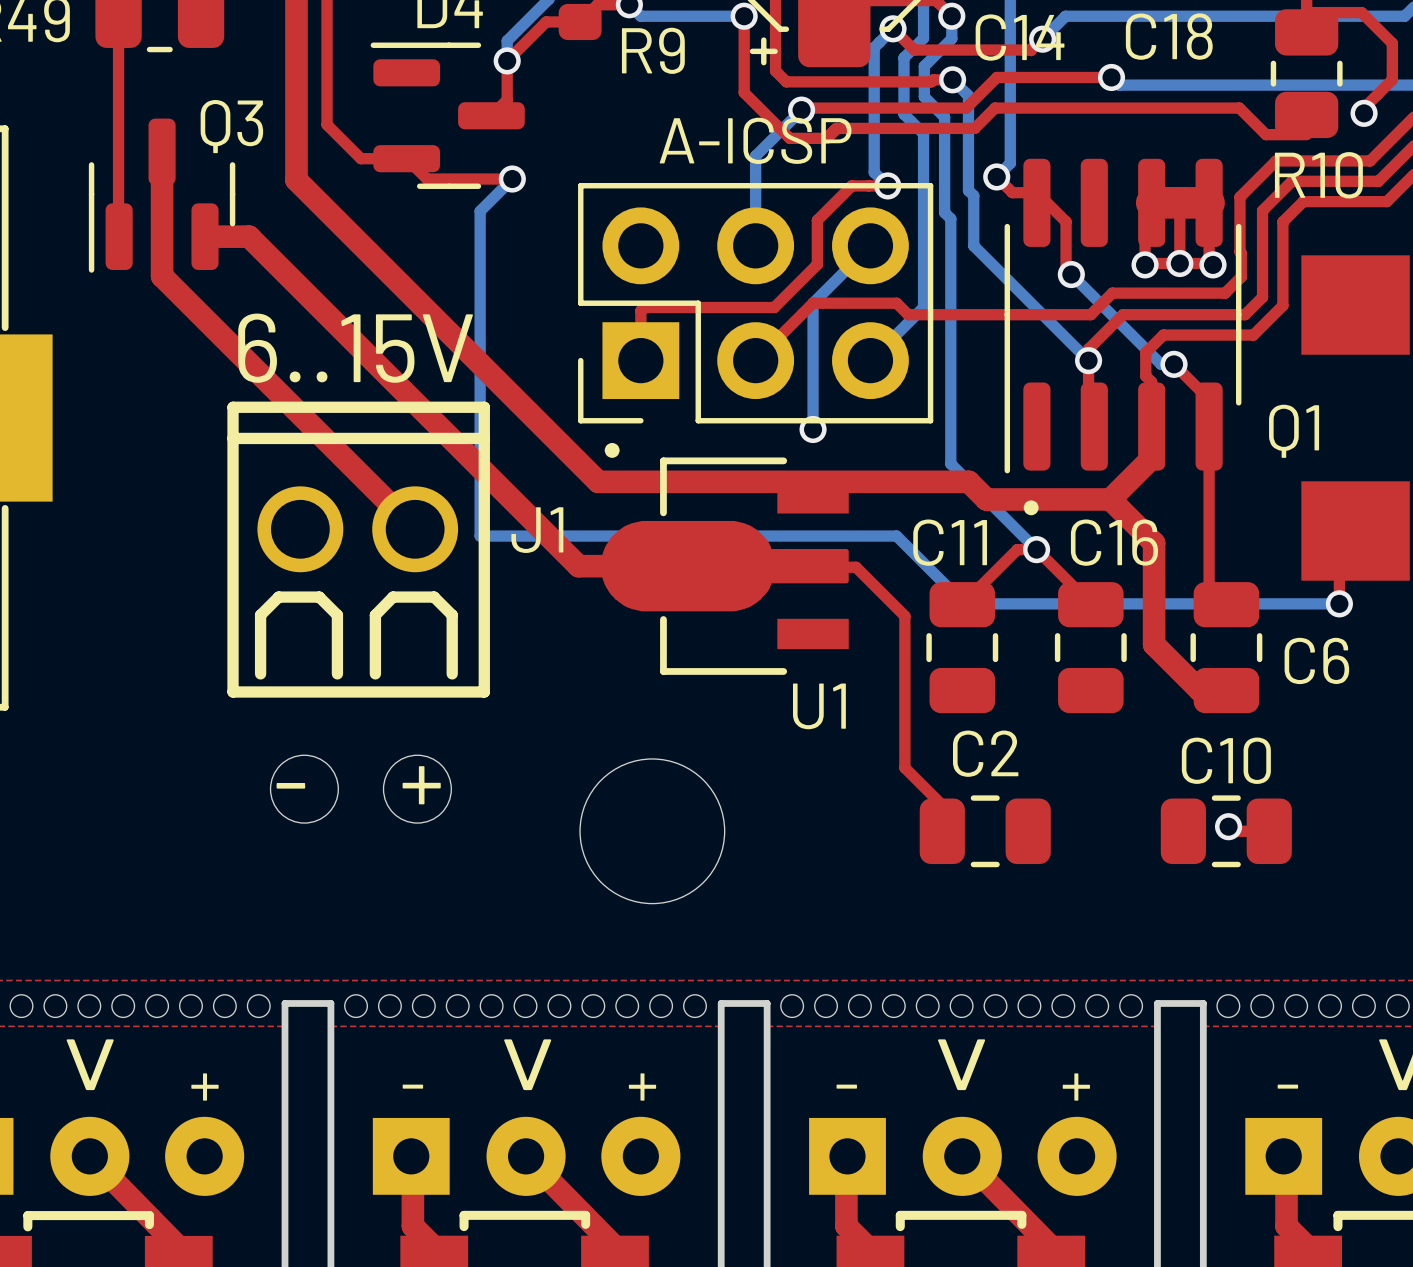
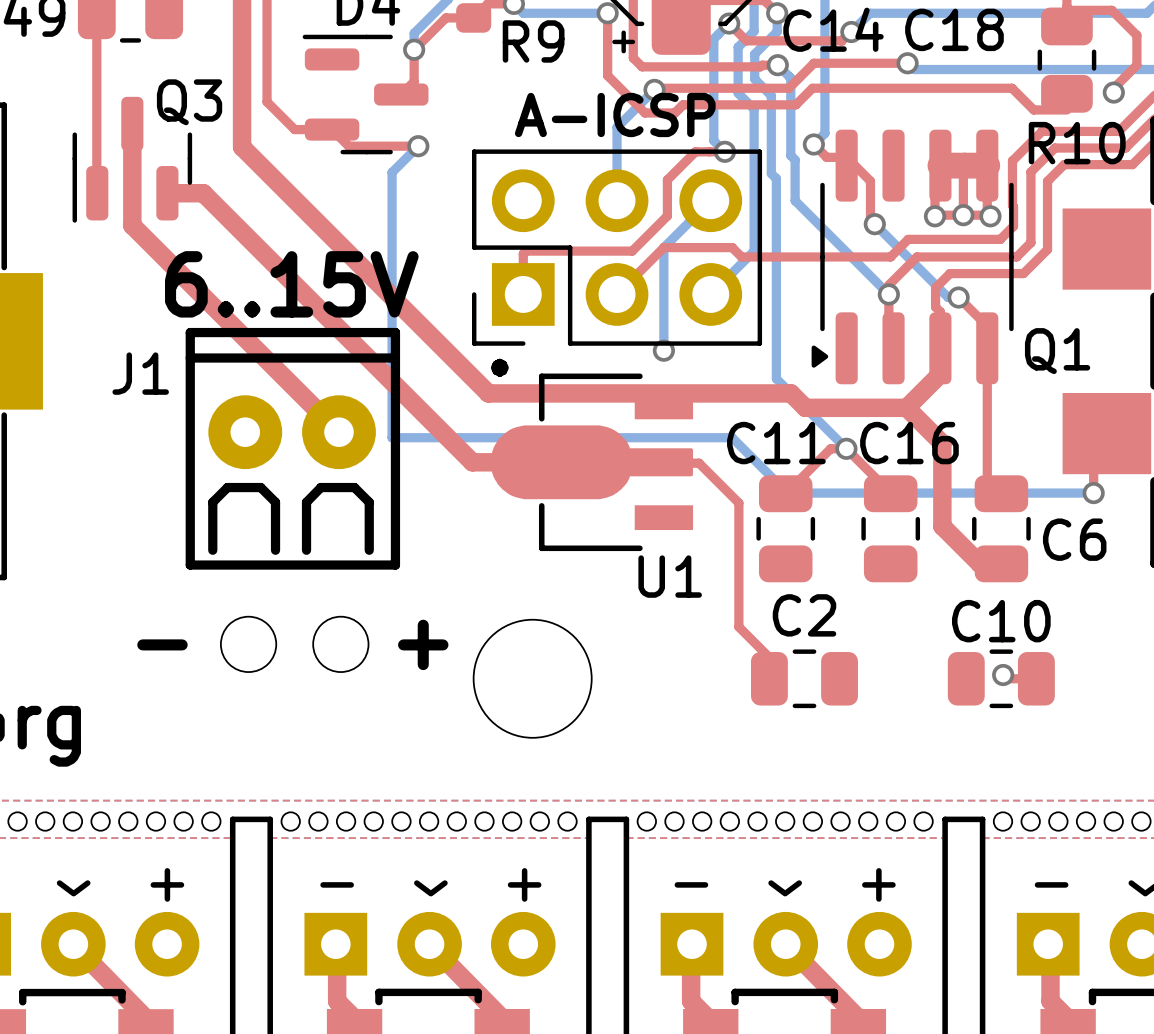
Q1 footprint: [1004, 158, 1242, 474] -> [811, 129, 1014, 385]
J1 footprint: [227, 401, 490, 698] -> [185, 327, 401, 570]
text: • (1031, 507) -> none
J1 name position: J1 (537, 530) -> J1 (140, 373)

